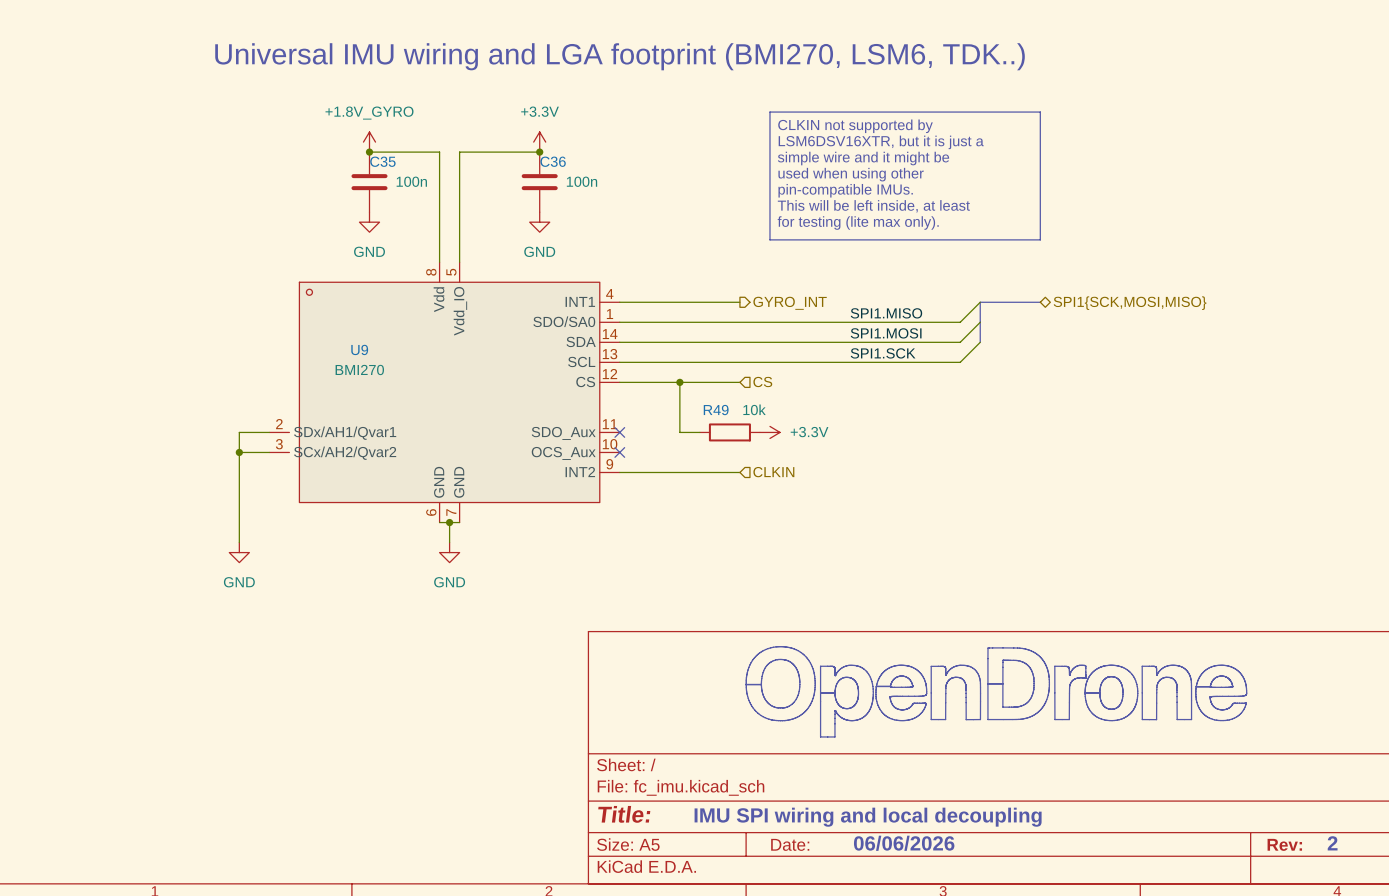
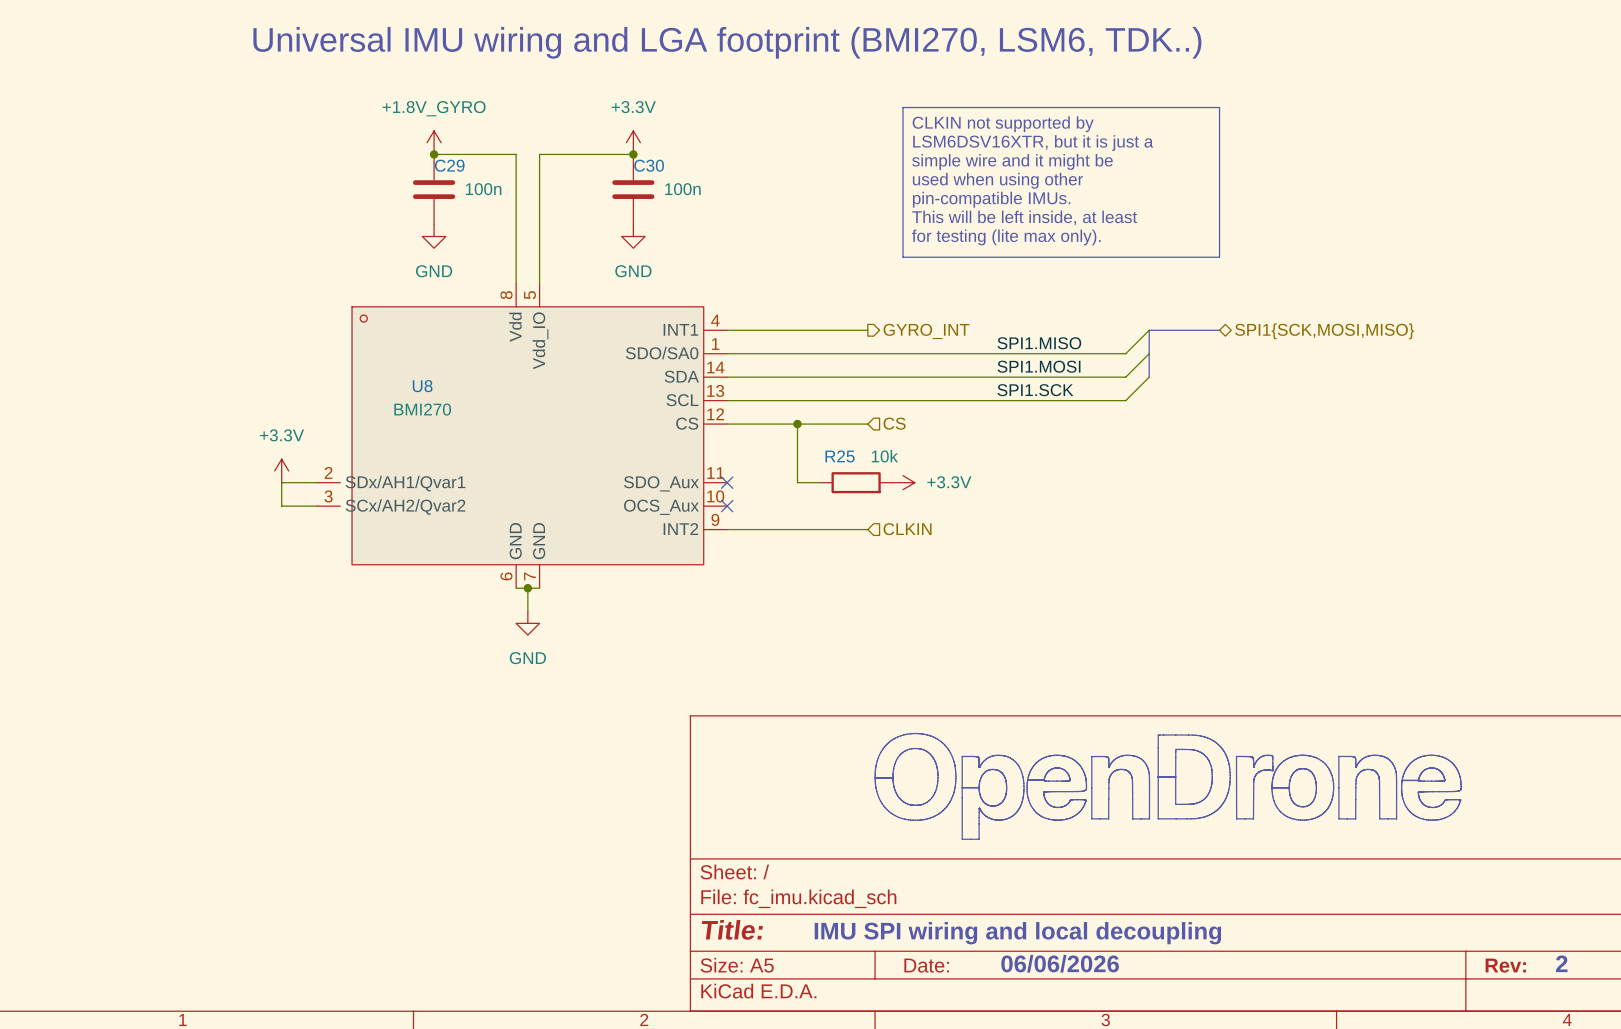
C35 name: C35 (382, 161) -> C29 (449, 165)
C36 name: C36 (553, 161) -> C30 (649, 165)
U9 name: U9 (359, 349) -> U8 (422, 386)
R49 name: R49 (716, 410) -> R25 (840, 456)
power symbol: none -> +3.3V (281, 470)
wire: (239, 452) (239, 542) -> none
junction: (239, 452) -> none
power symbol: GND (239, 552) -> none

